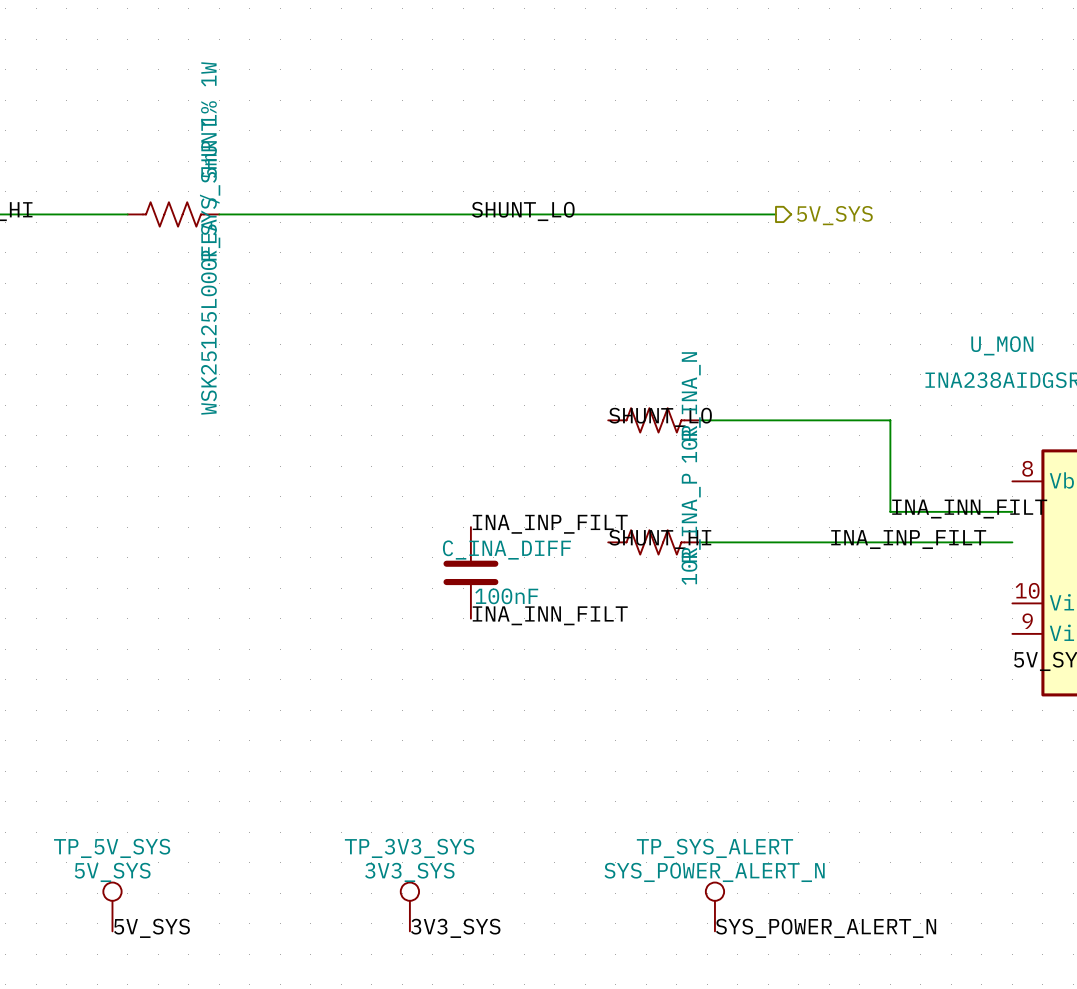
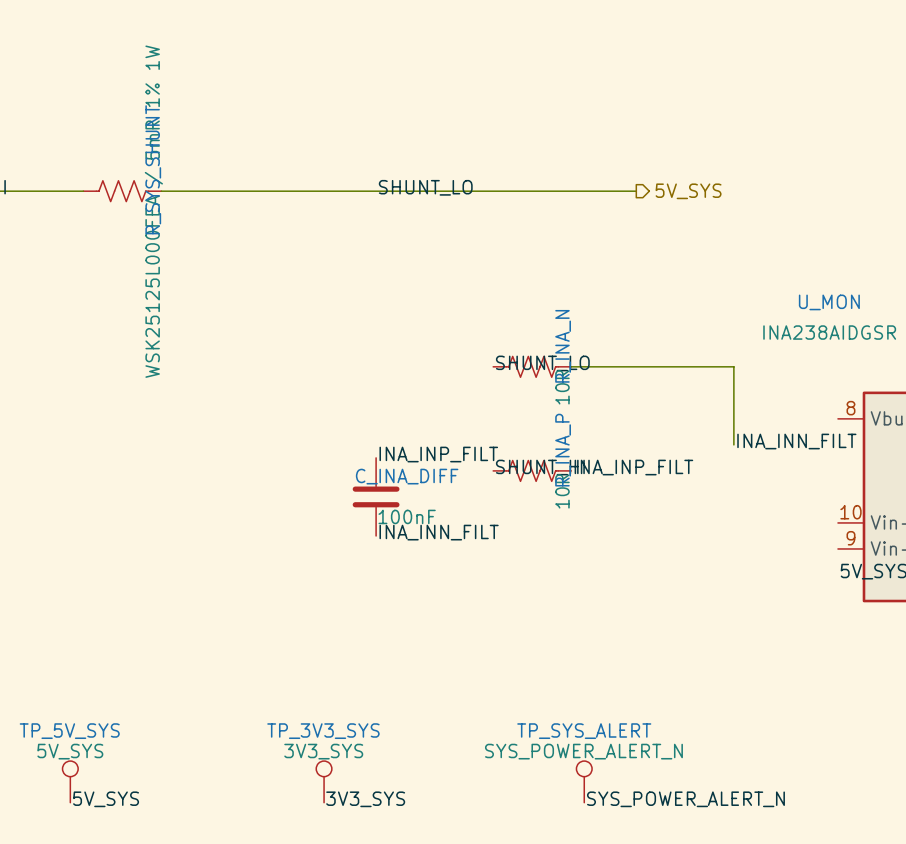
wire: (890, 511) (1012, 511) -> none
label position: INA_INP_FILT (908, 539) -> INA_INP_FILT (633, 467)
wire: (699, 542) (1012, 542) -> none

